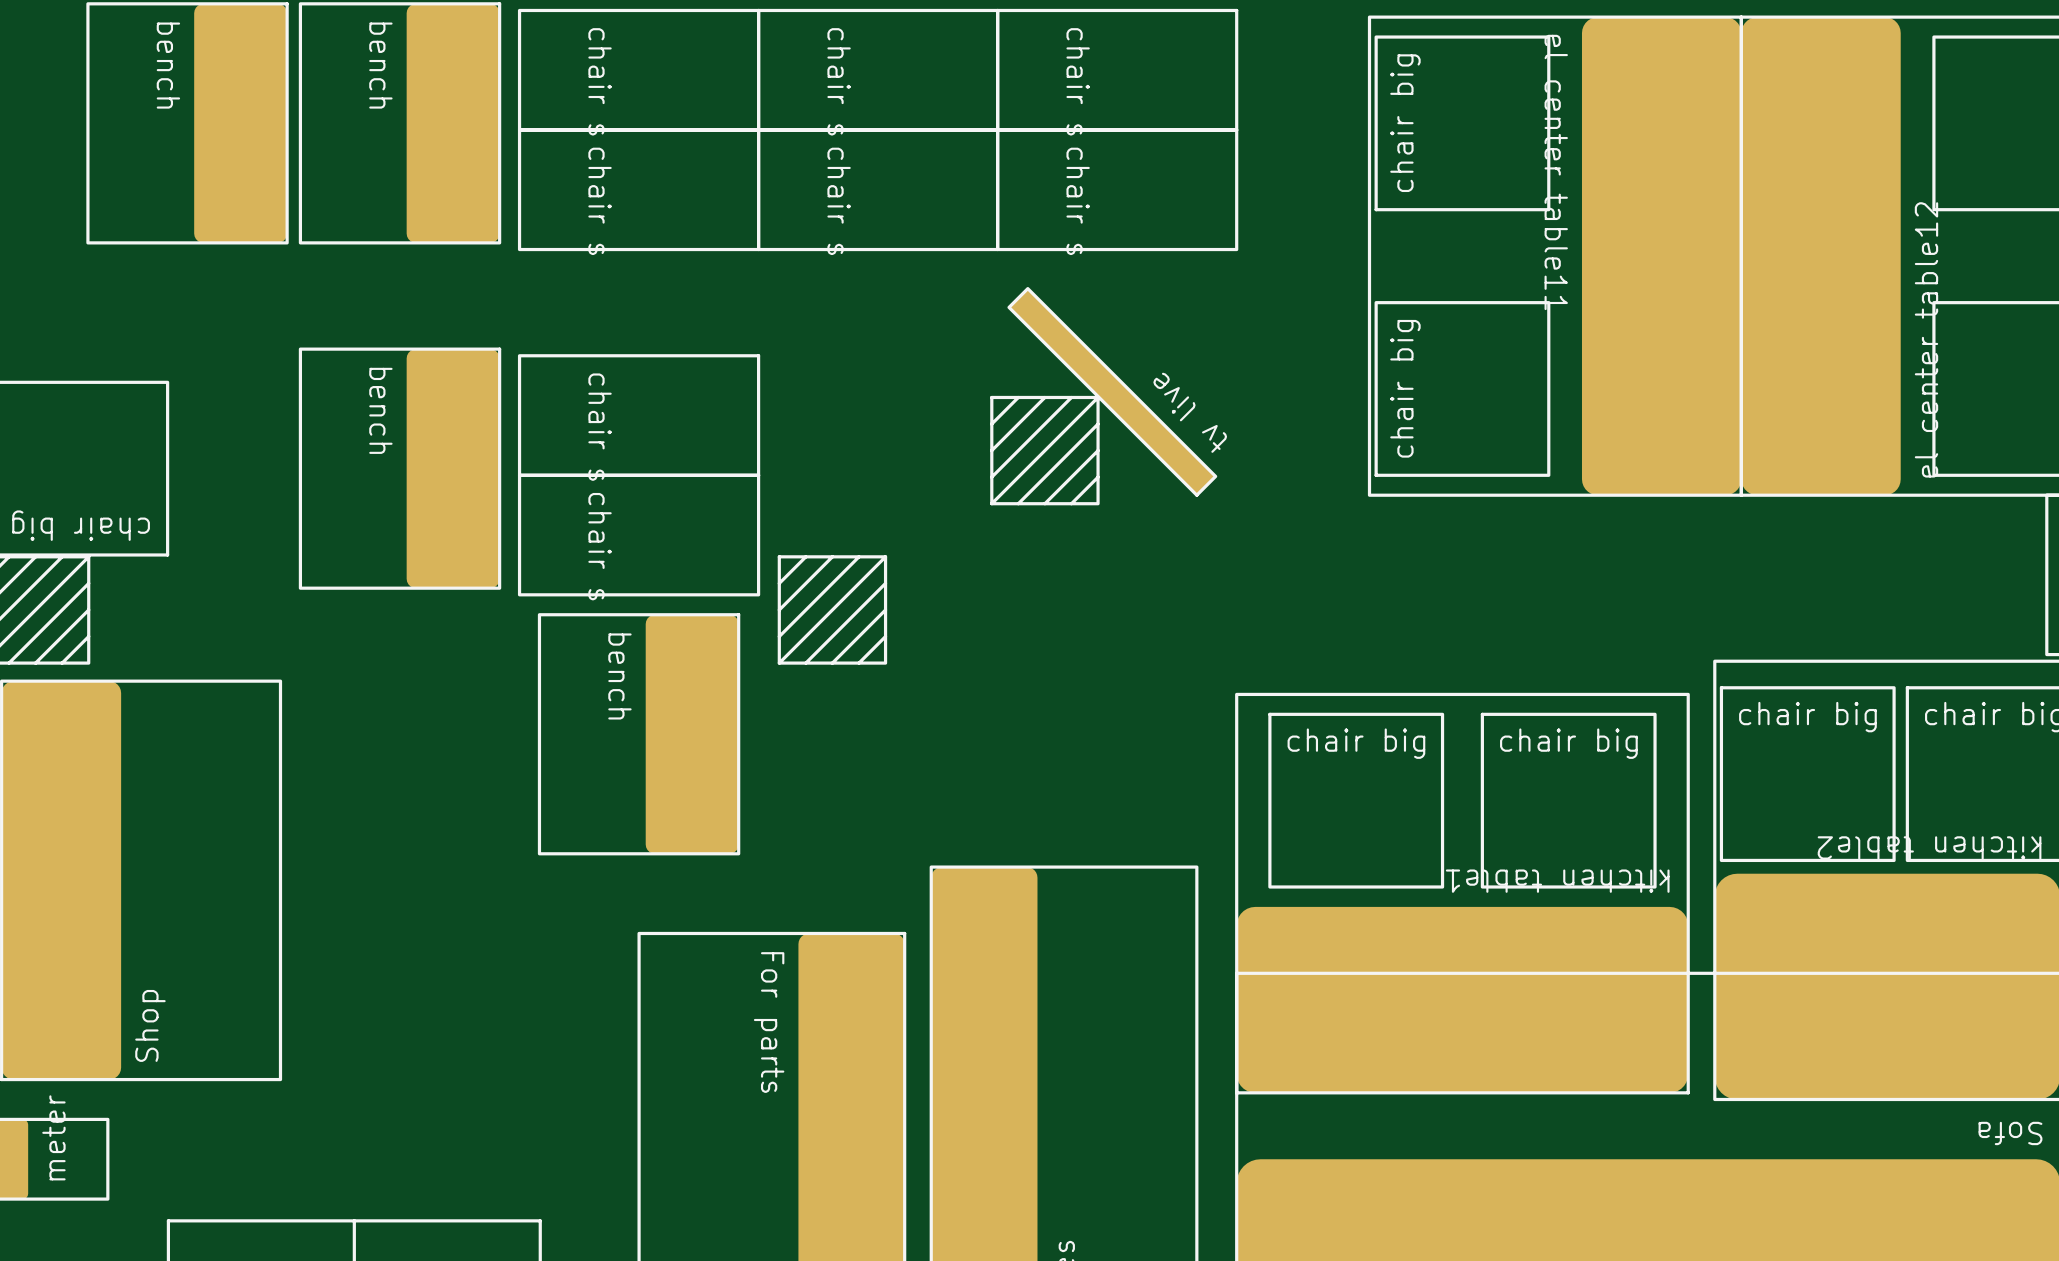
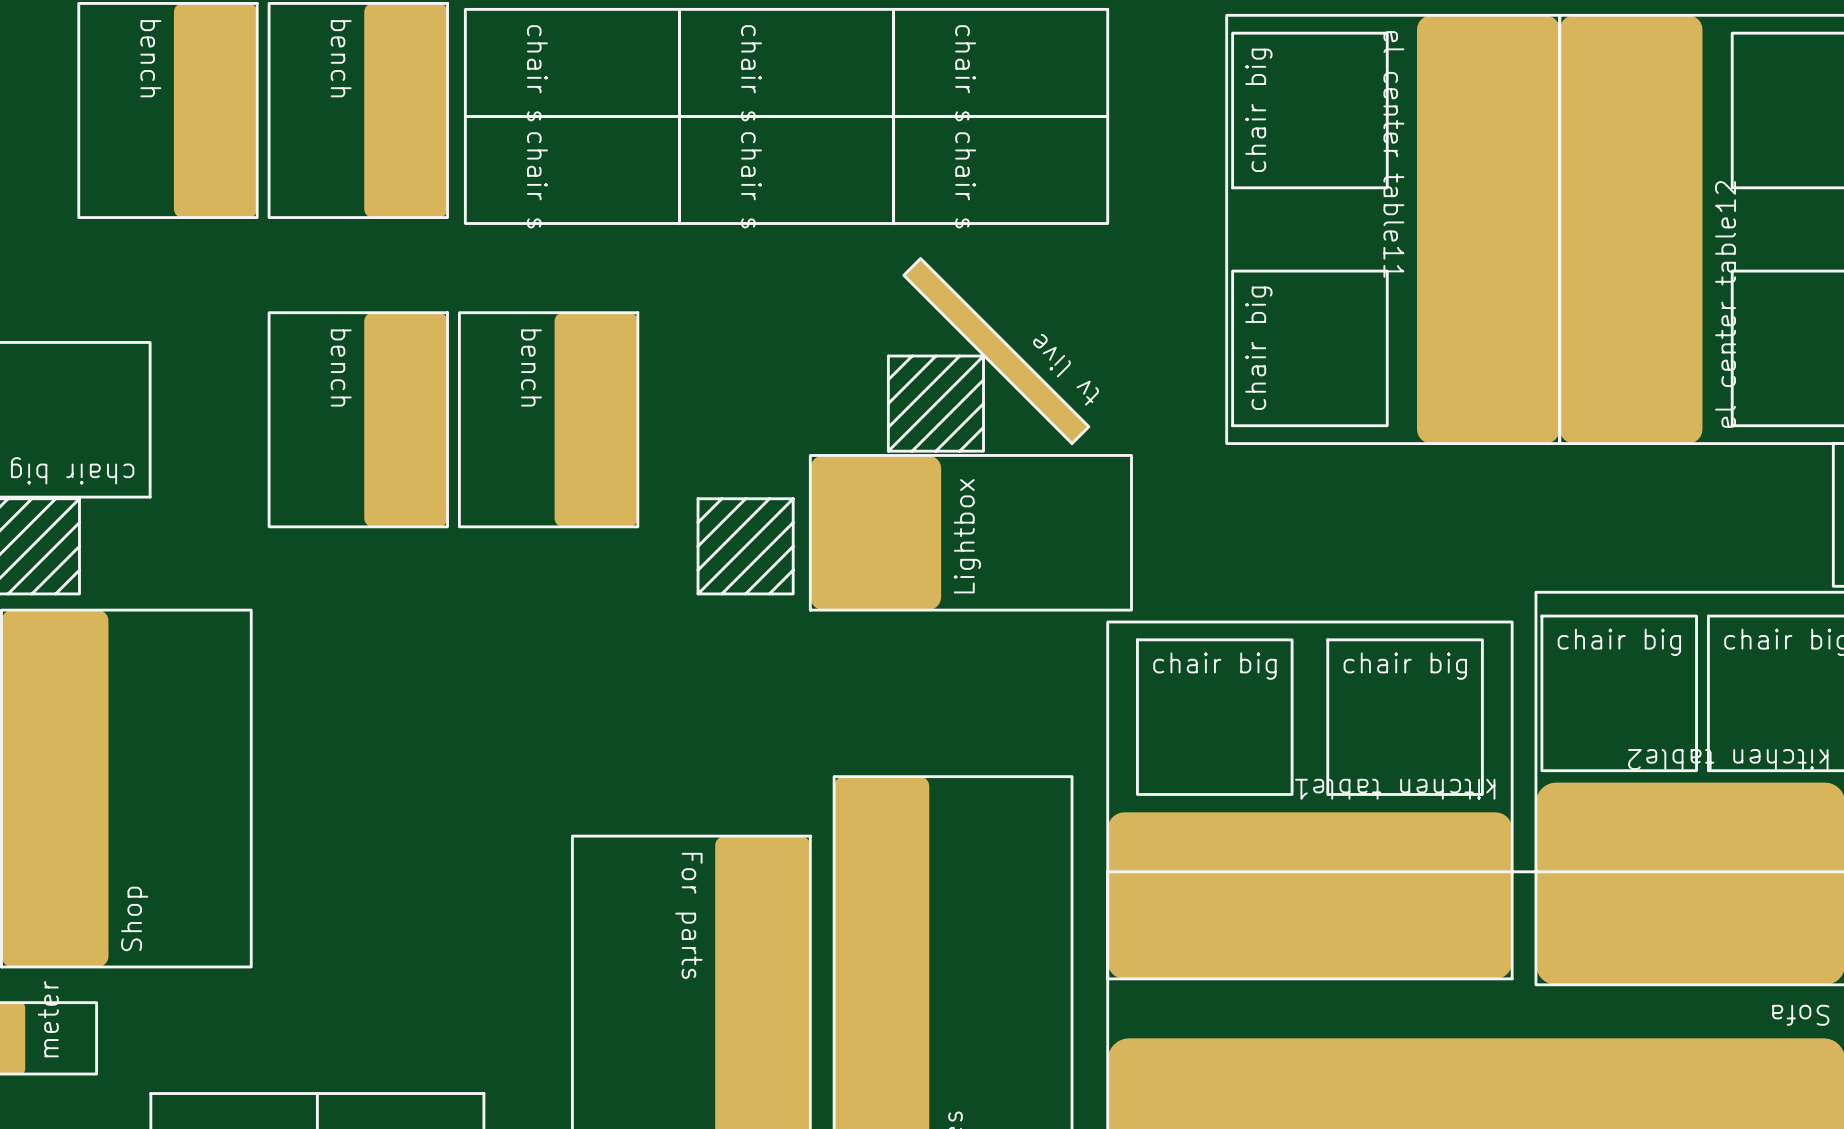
drawing: [517, 354, 761, 597] -> none
part: none -> Lightbox (970, 532)
part position: (639, 734) -> (548, 419)

